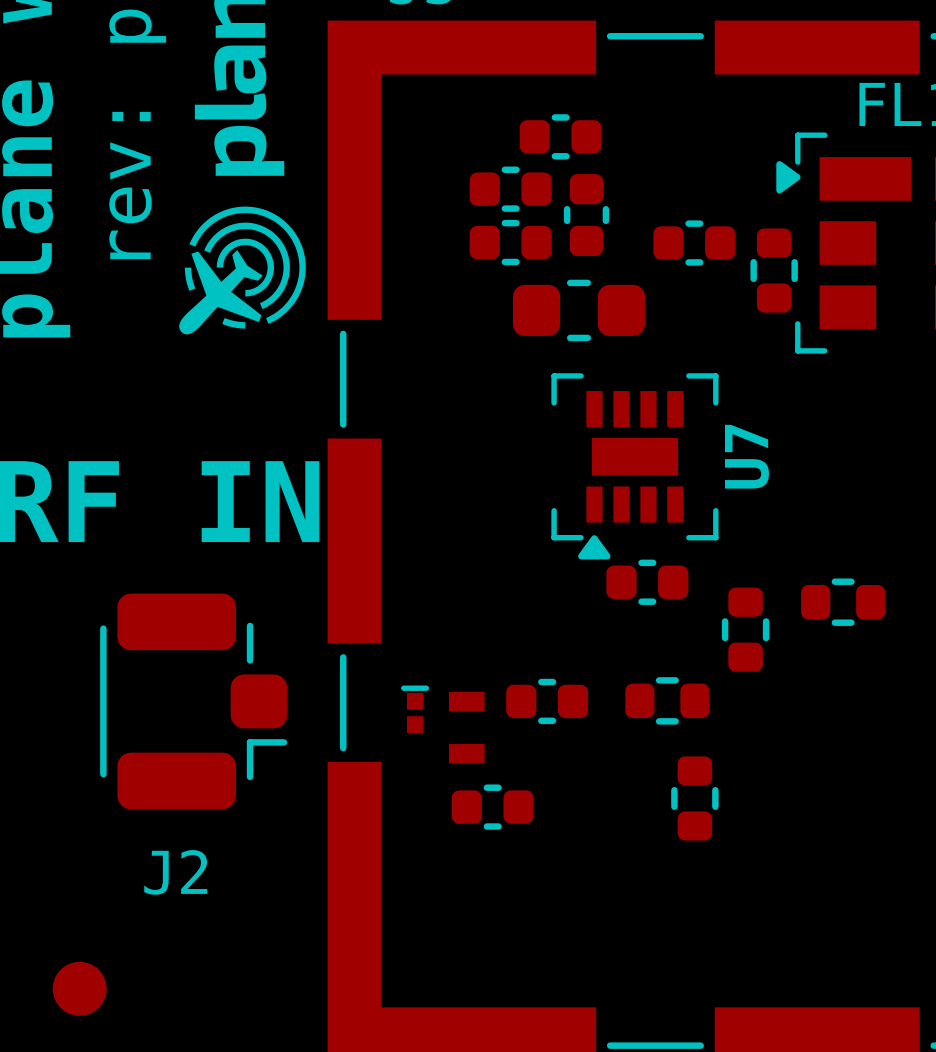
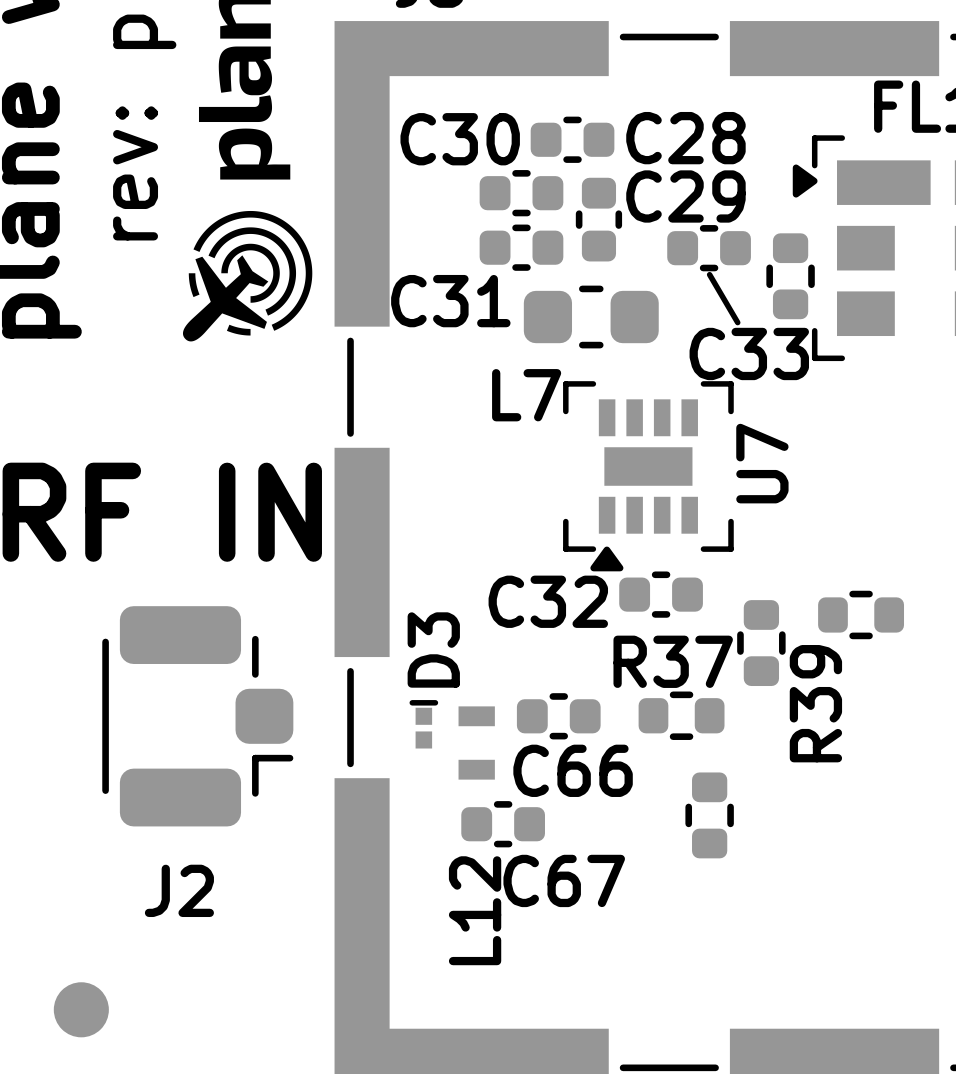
C28 name: none -> C28 (685, 138)
C30 name: none -> C30 (460, 139)
C29 name: none -> C29 (685, 196)
line: none -> (709, 274) (737, 322)
C31 name: none -> C31 (450, 301)
C33 name: none -> C33 (749, 353)
L7 name: none -> L7 (526, 395)
C32 name: none -> C32 (548, 601)
D3 name: none -> D3 (433, 649)
R37 name: none -> R37 (673, 661)
R39 name: none -> R39 (815, 703)
C66 name: none -> C66 (573, 770)
C67 name: none -> C67 (564, 880)
L12 name: none -> L12 (475, 910)

